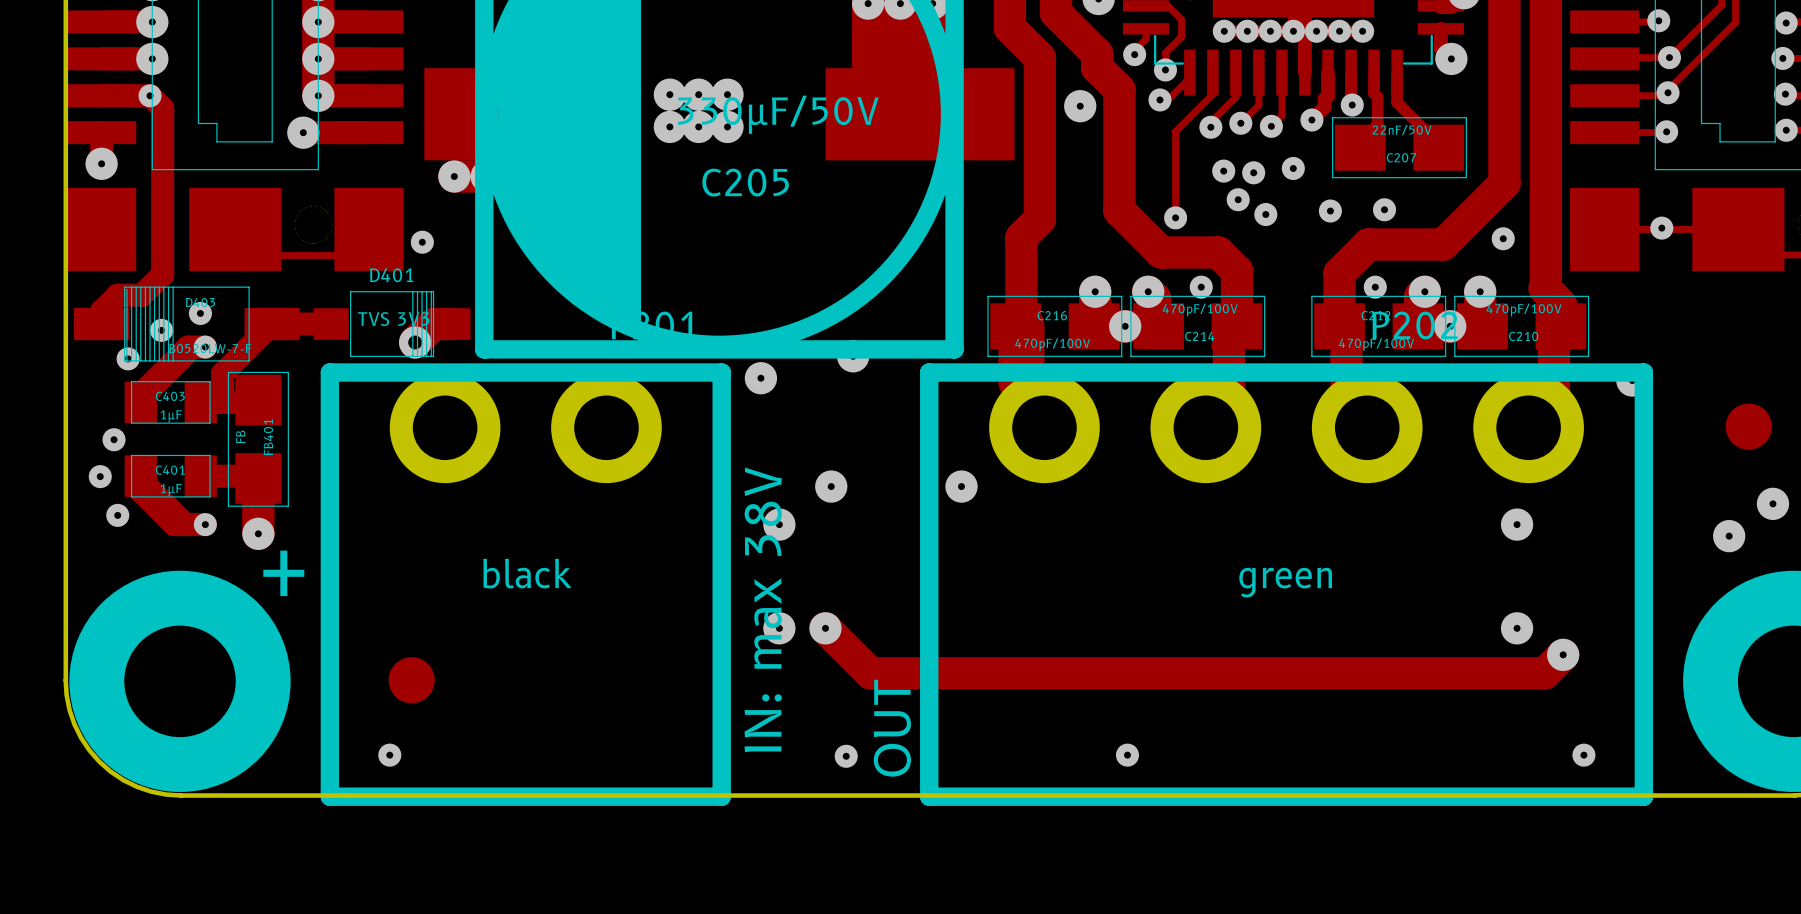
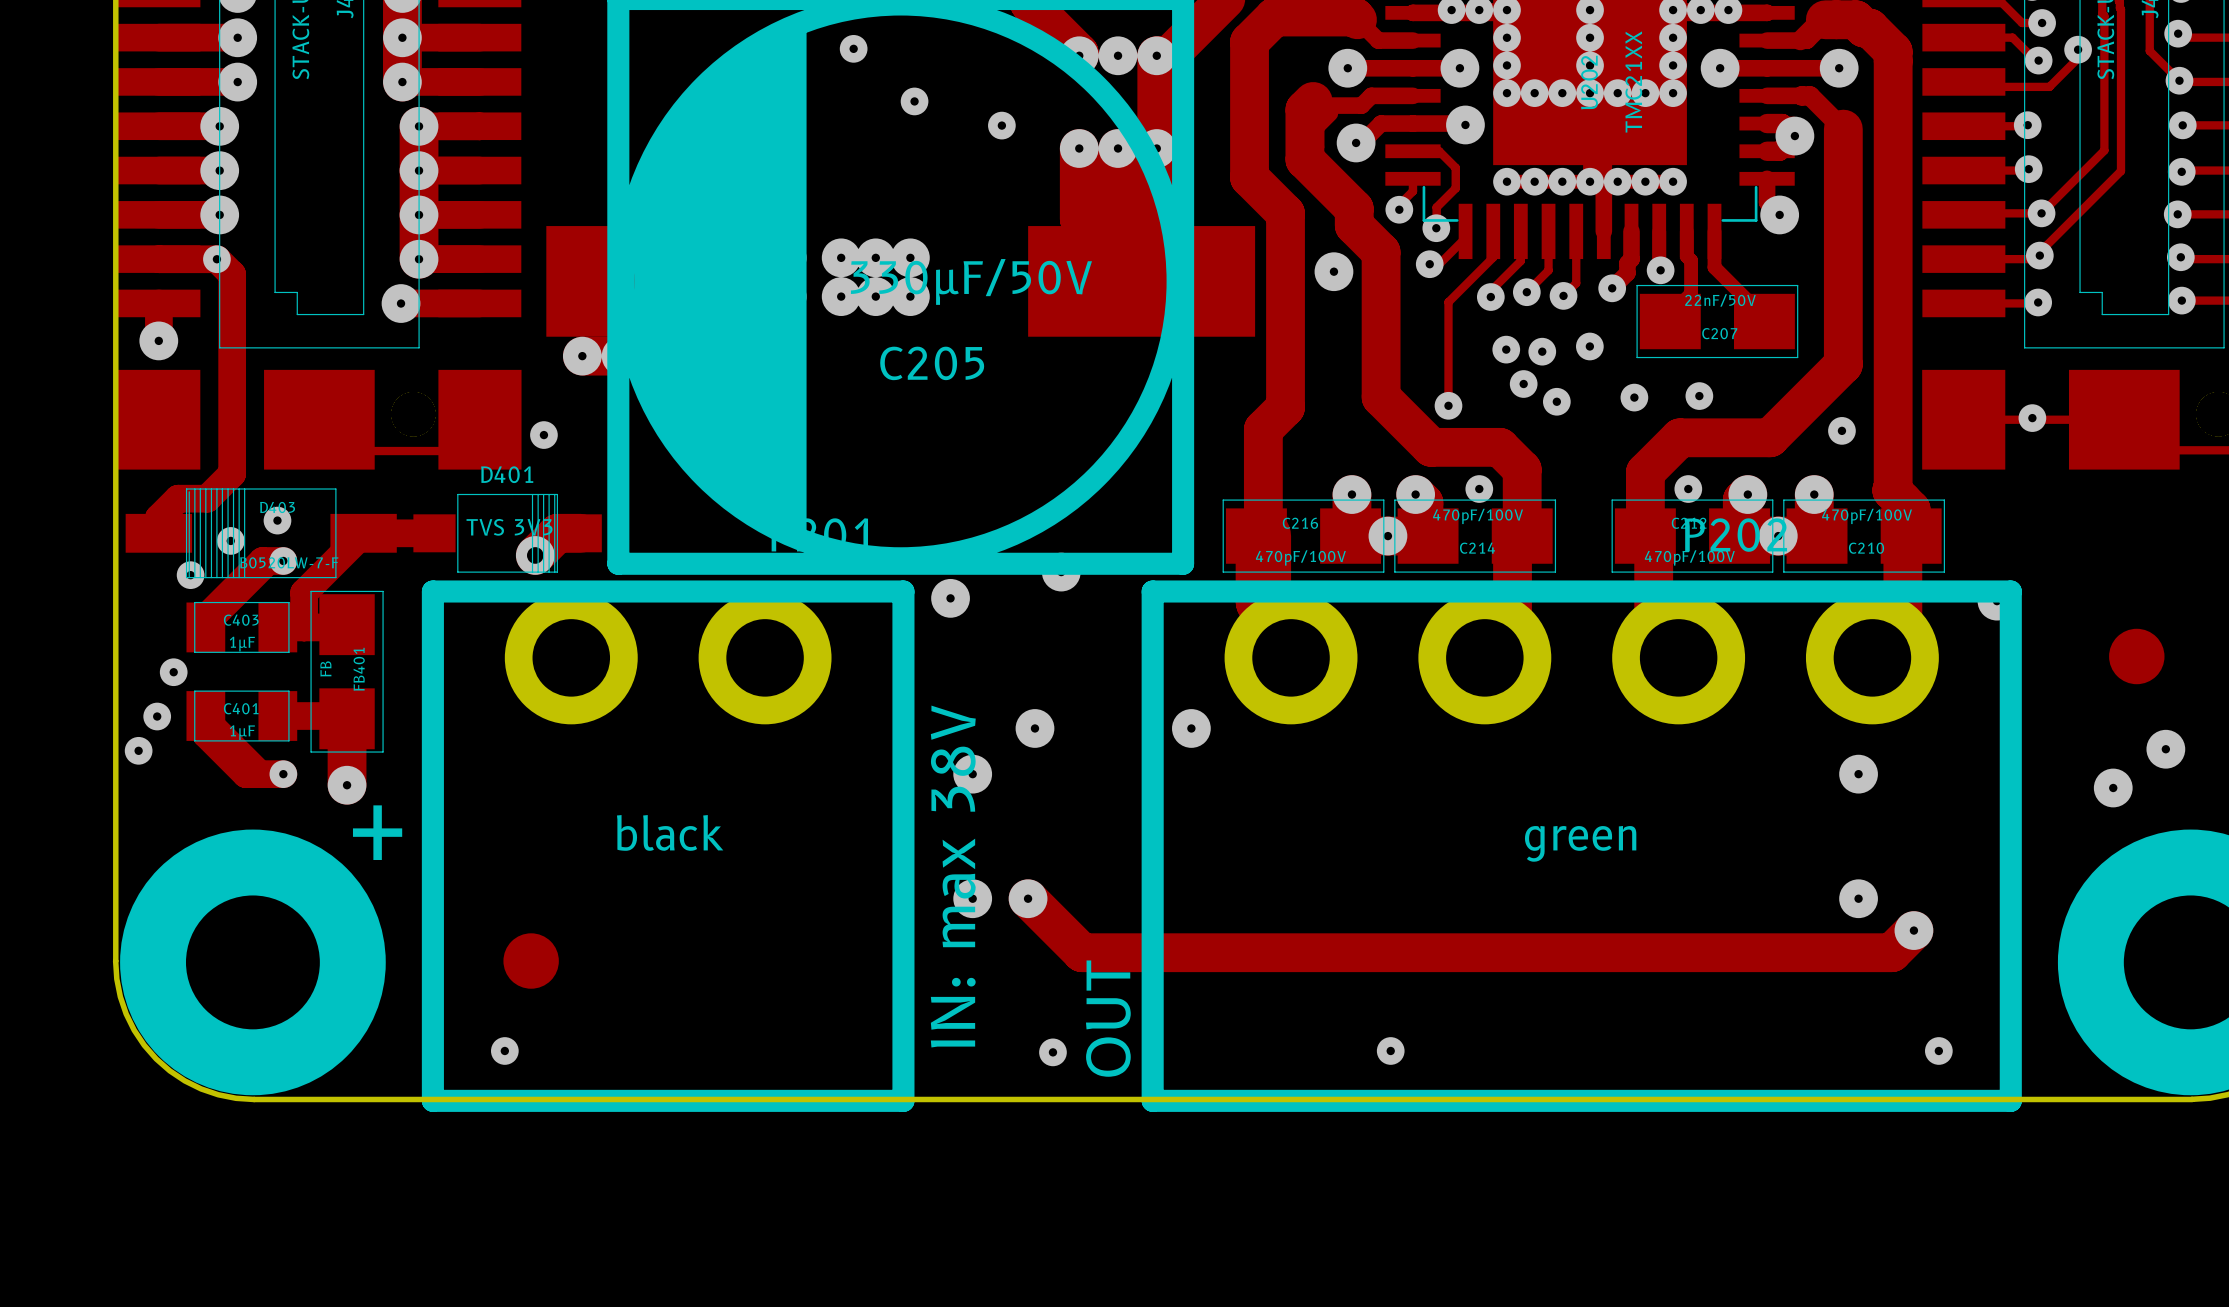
via position: (117, 515) -> (138, 750)

